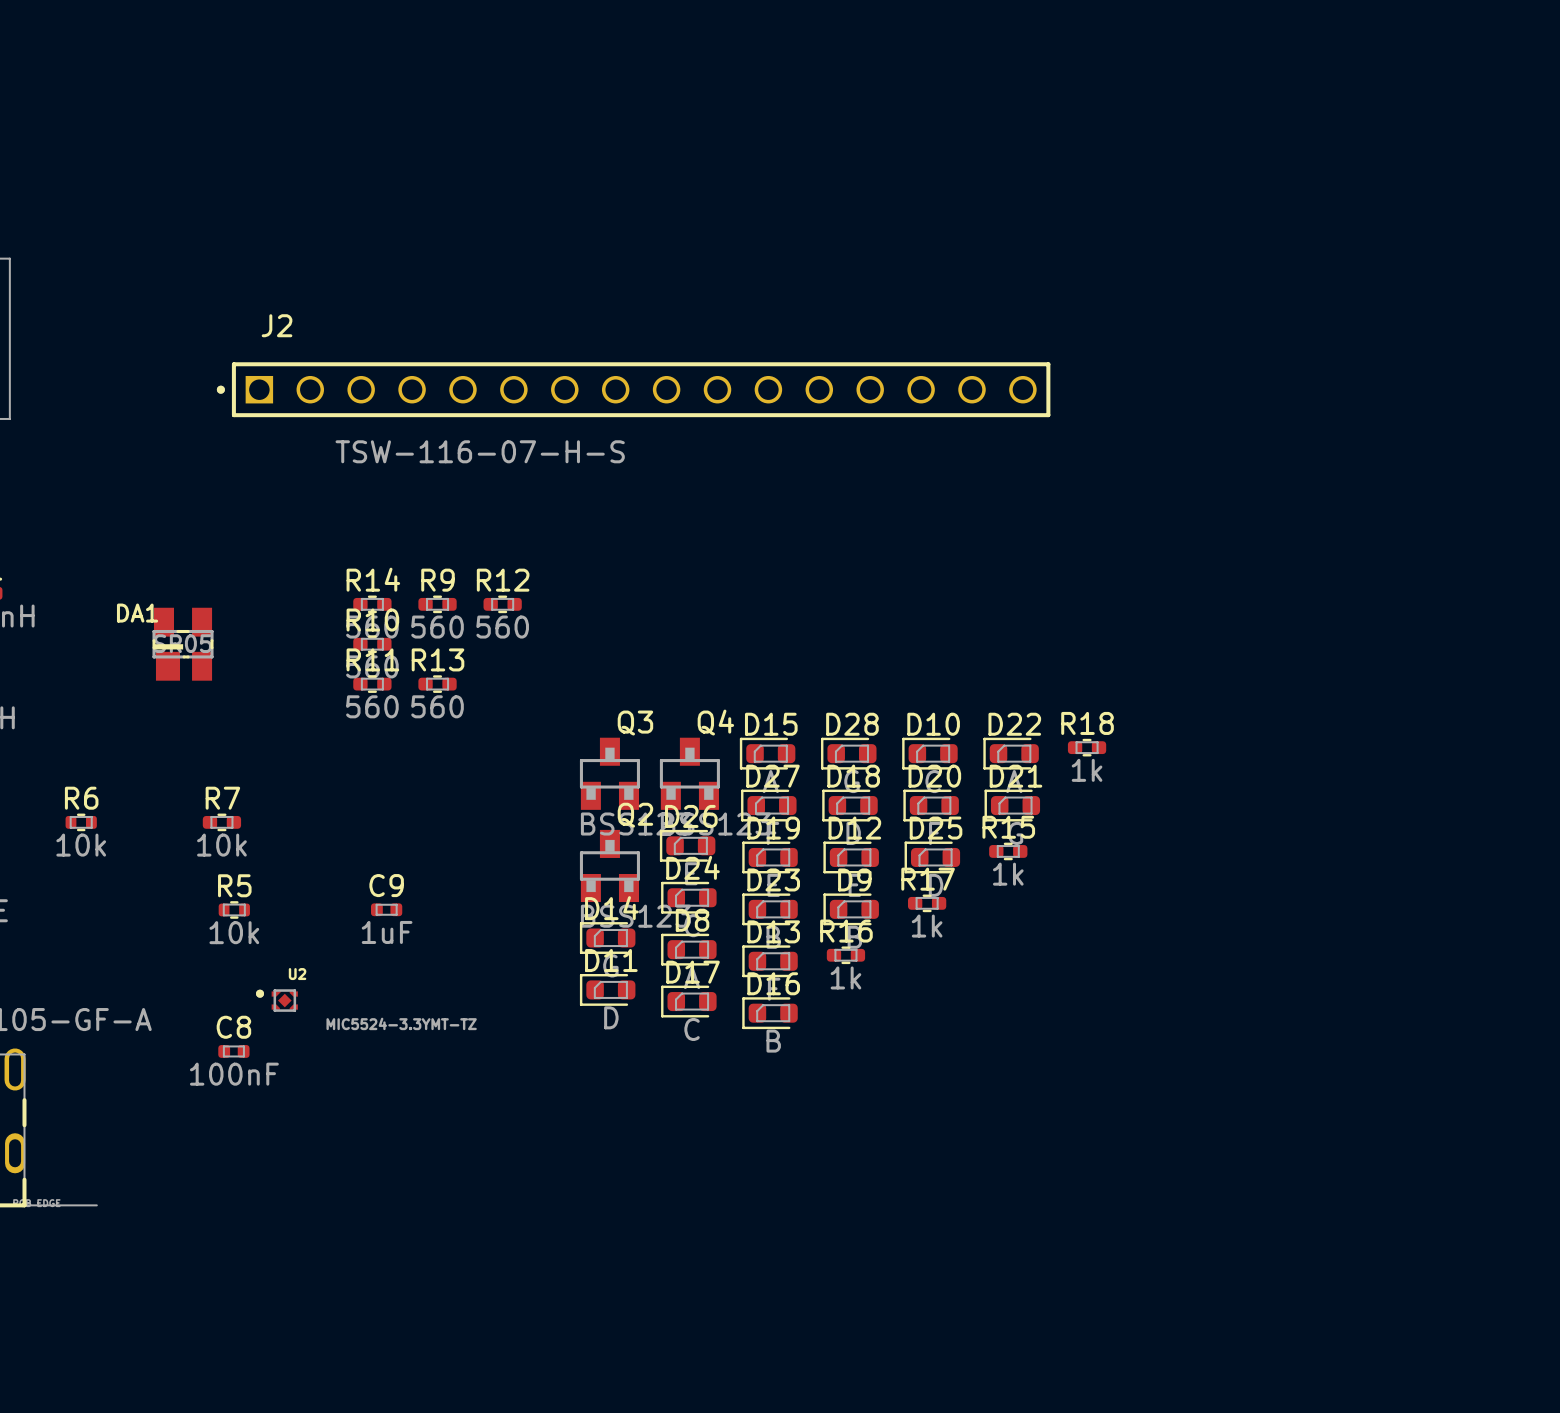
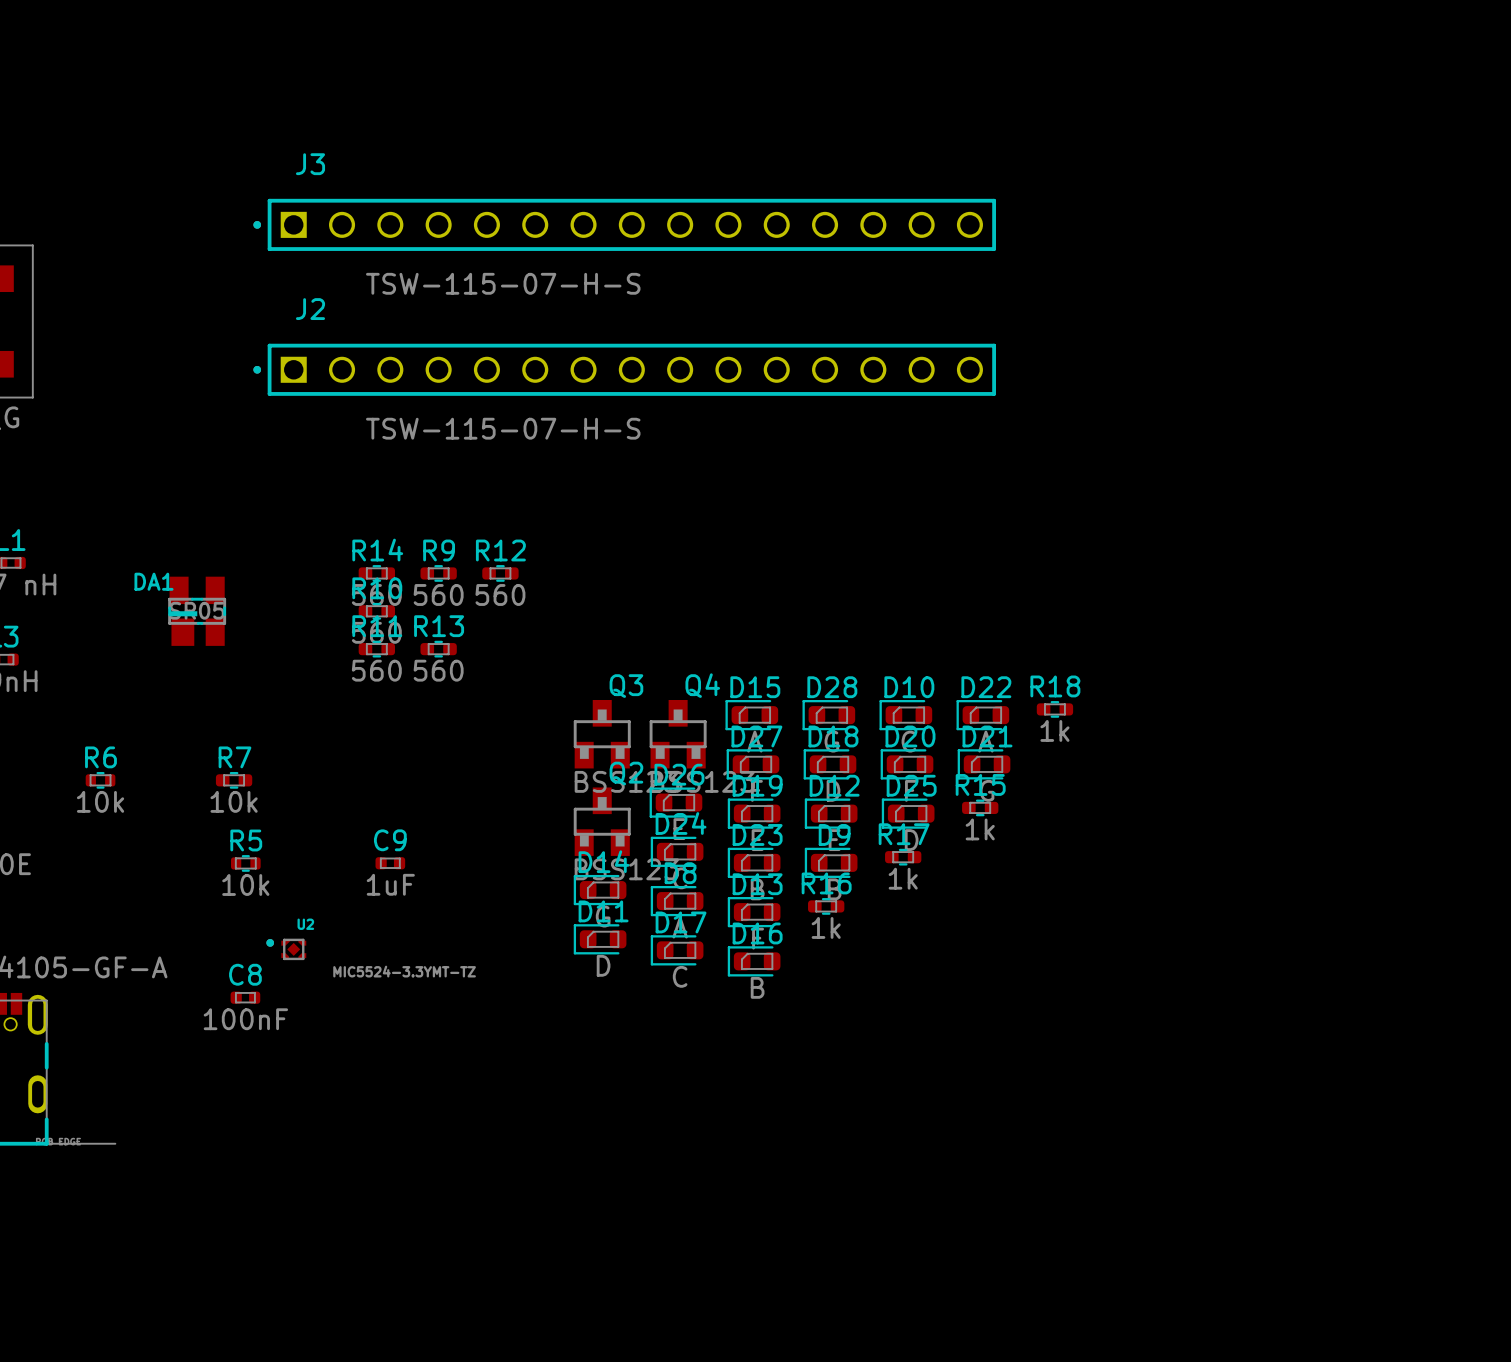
J3: none -> TSW-115-07-H-S (624, 224)
J2 footprint: [216, 362, 1051, 418] -> [253, 343, 997, 396]
J2 value: TSW-116-07-H-S (480, 451) -> TSW-115-07-H-S (503, 428)

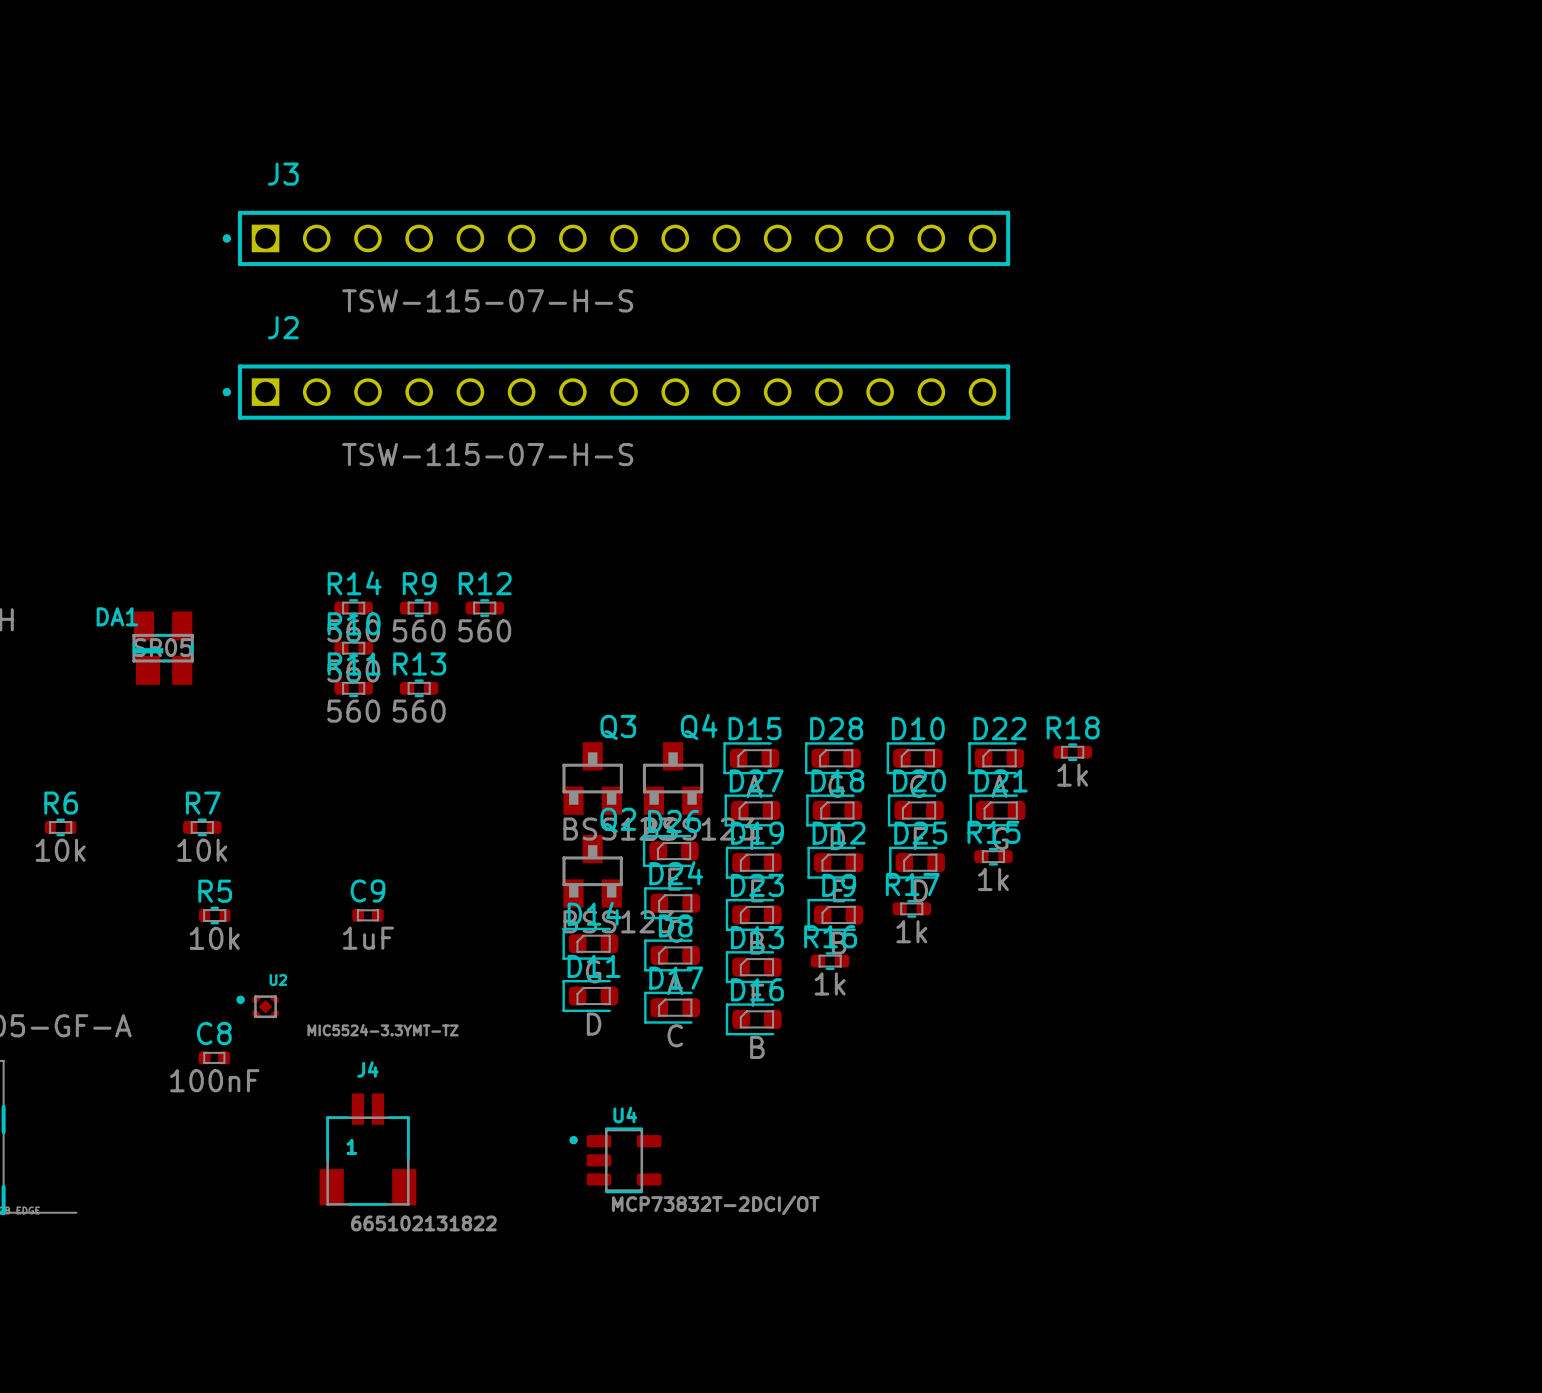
J4: none -> 665102131822 (367, 1149)
U4: none -> MCP73832T-2DCI/OT (615, 1160)

